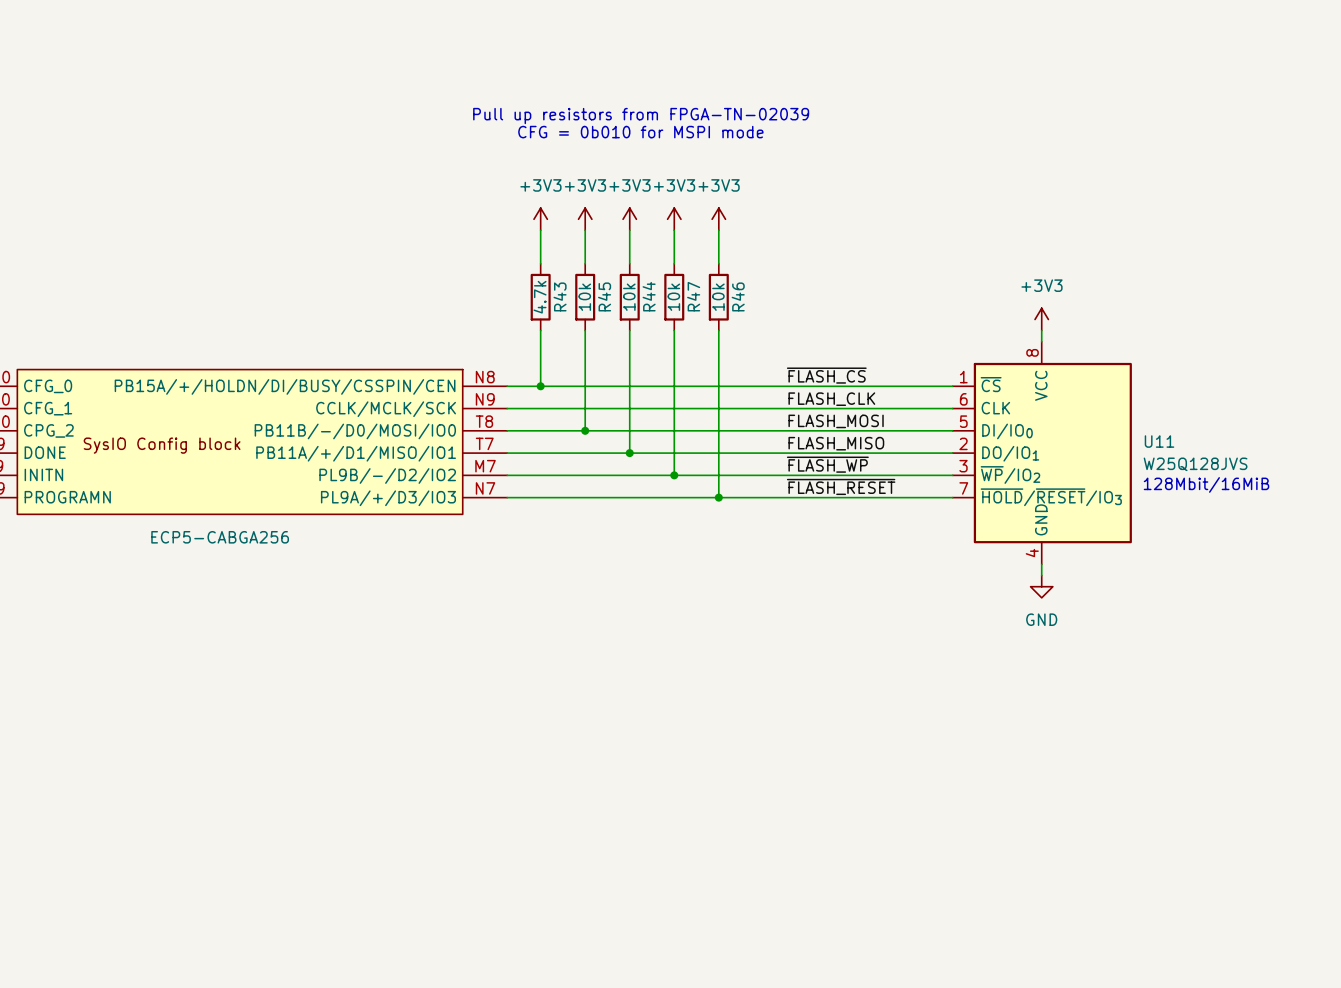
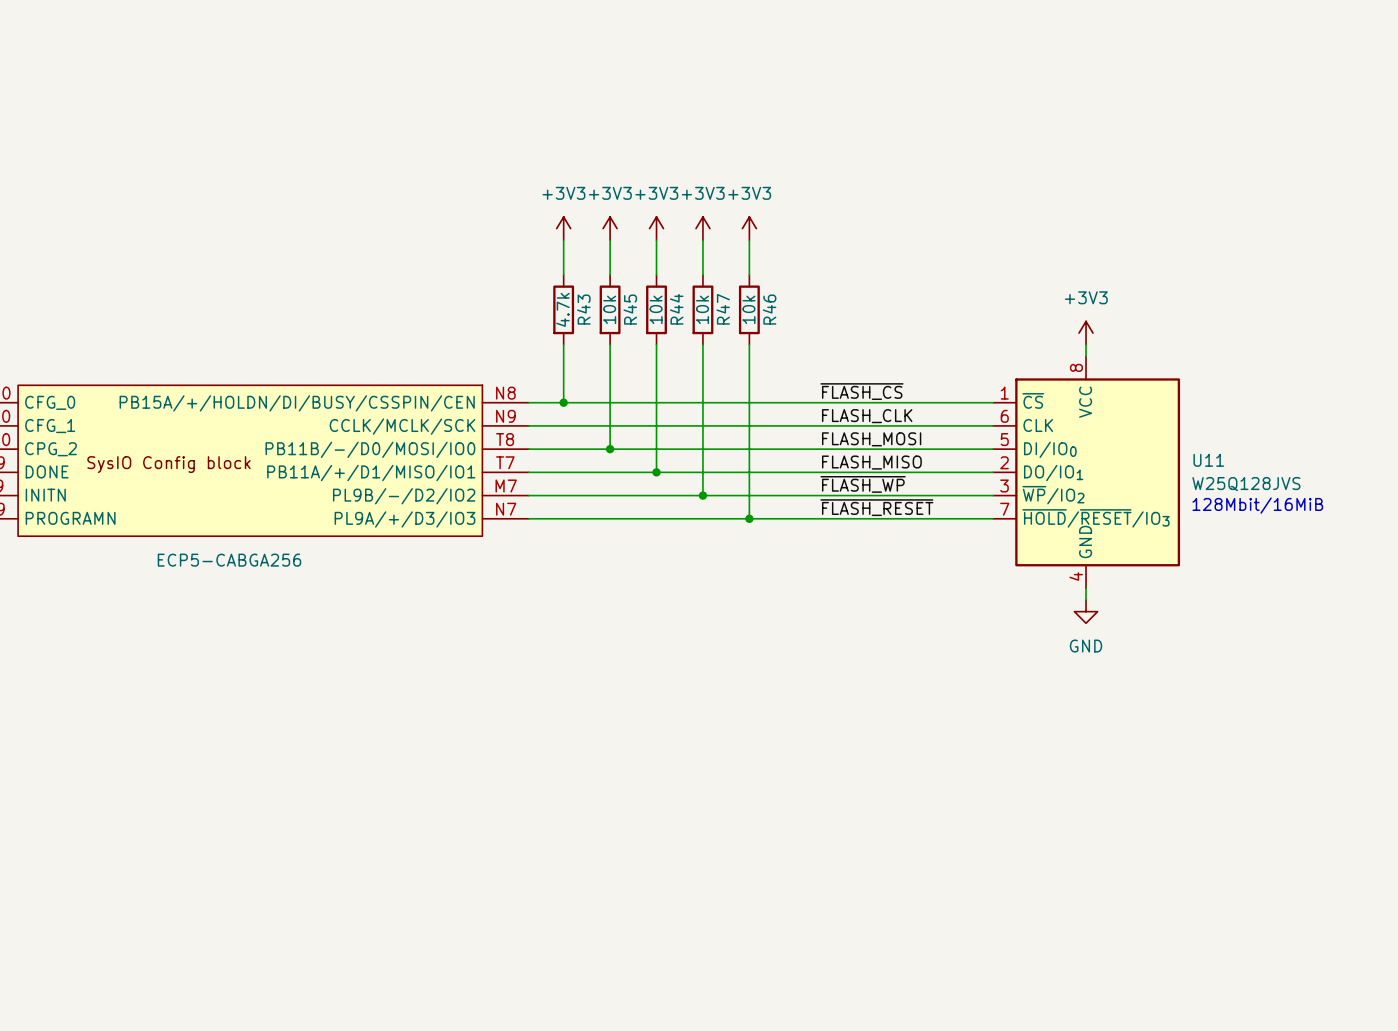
text: Pull up resistors from FPGA-TN-02039 (641, 116) -> none
text: CFG = 0b010 for MSPI mode (640, 132) -> none

